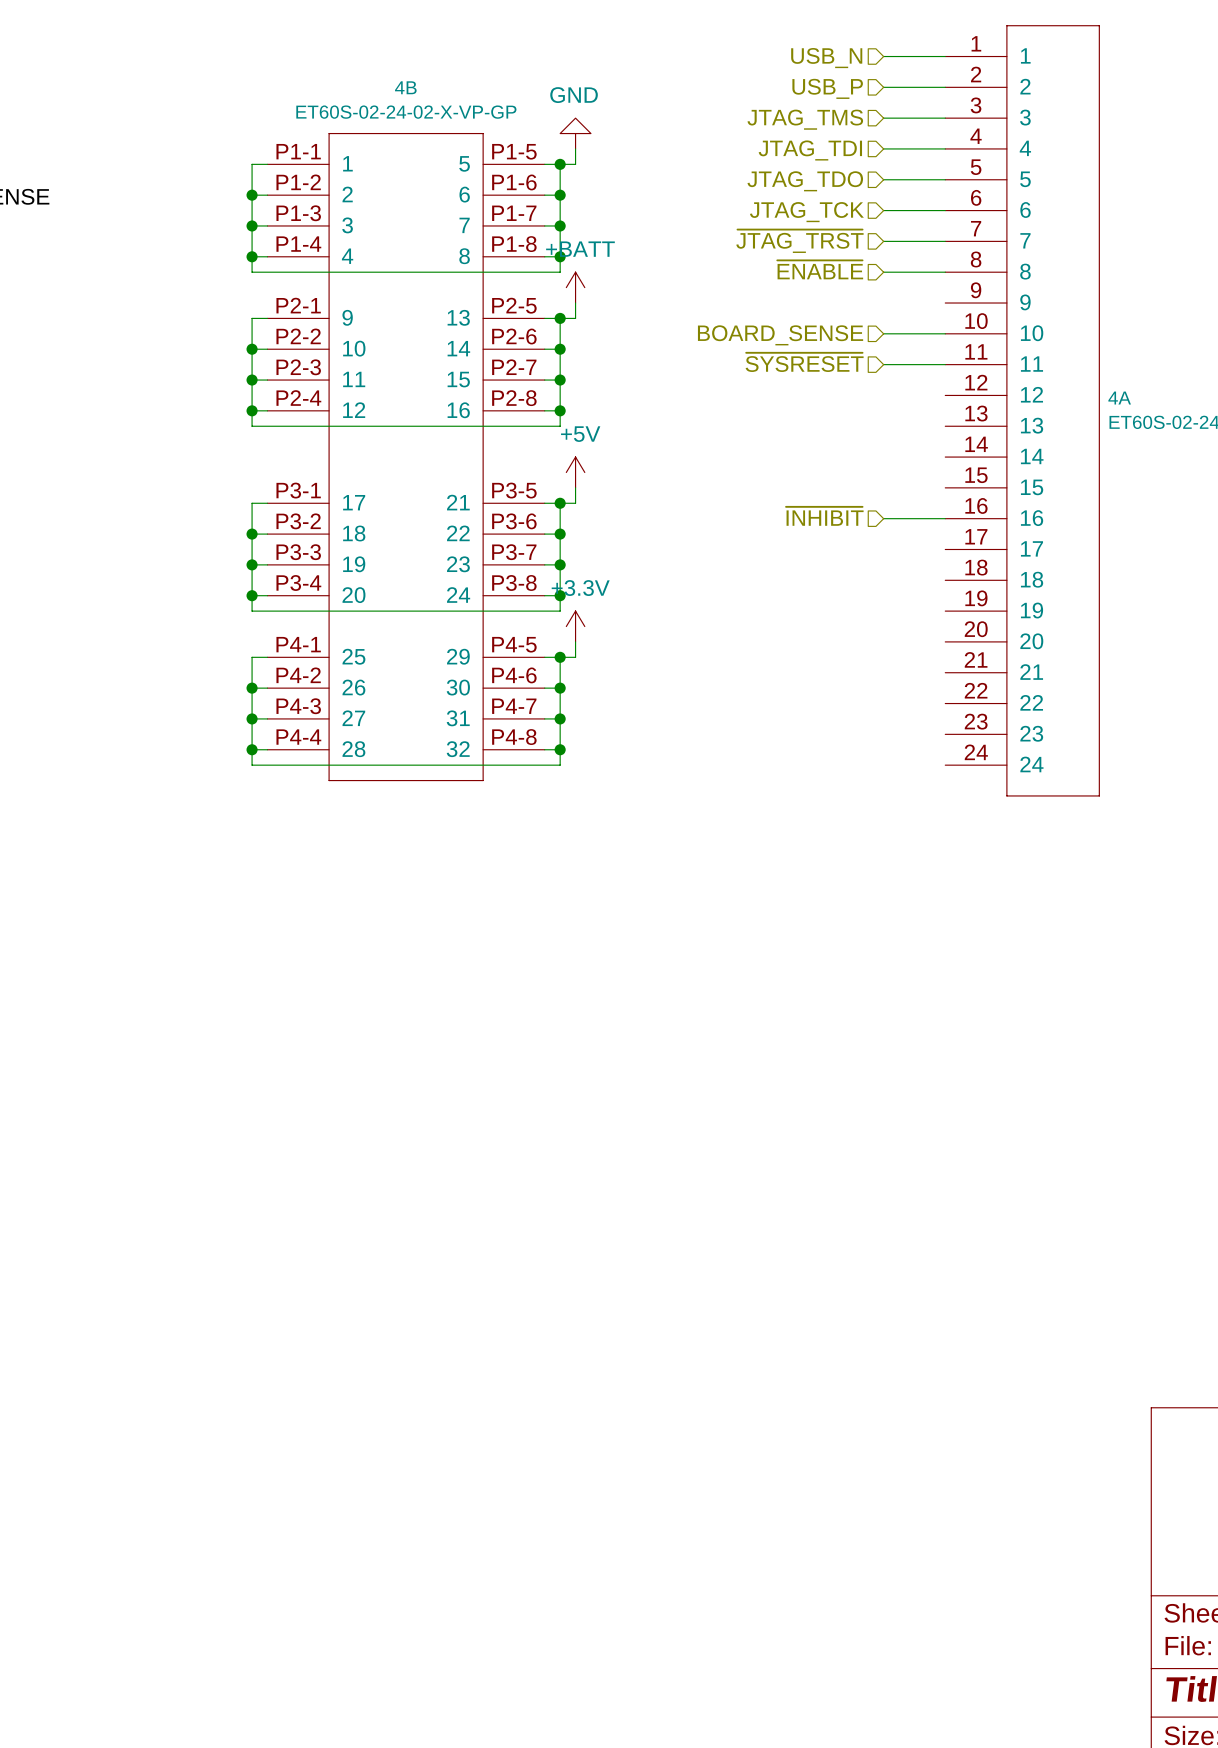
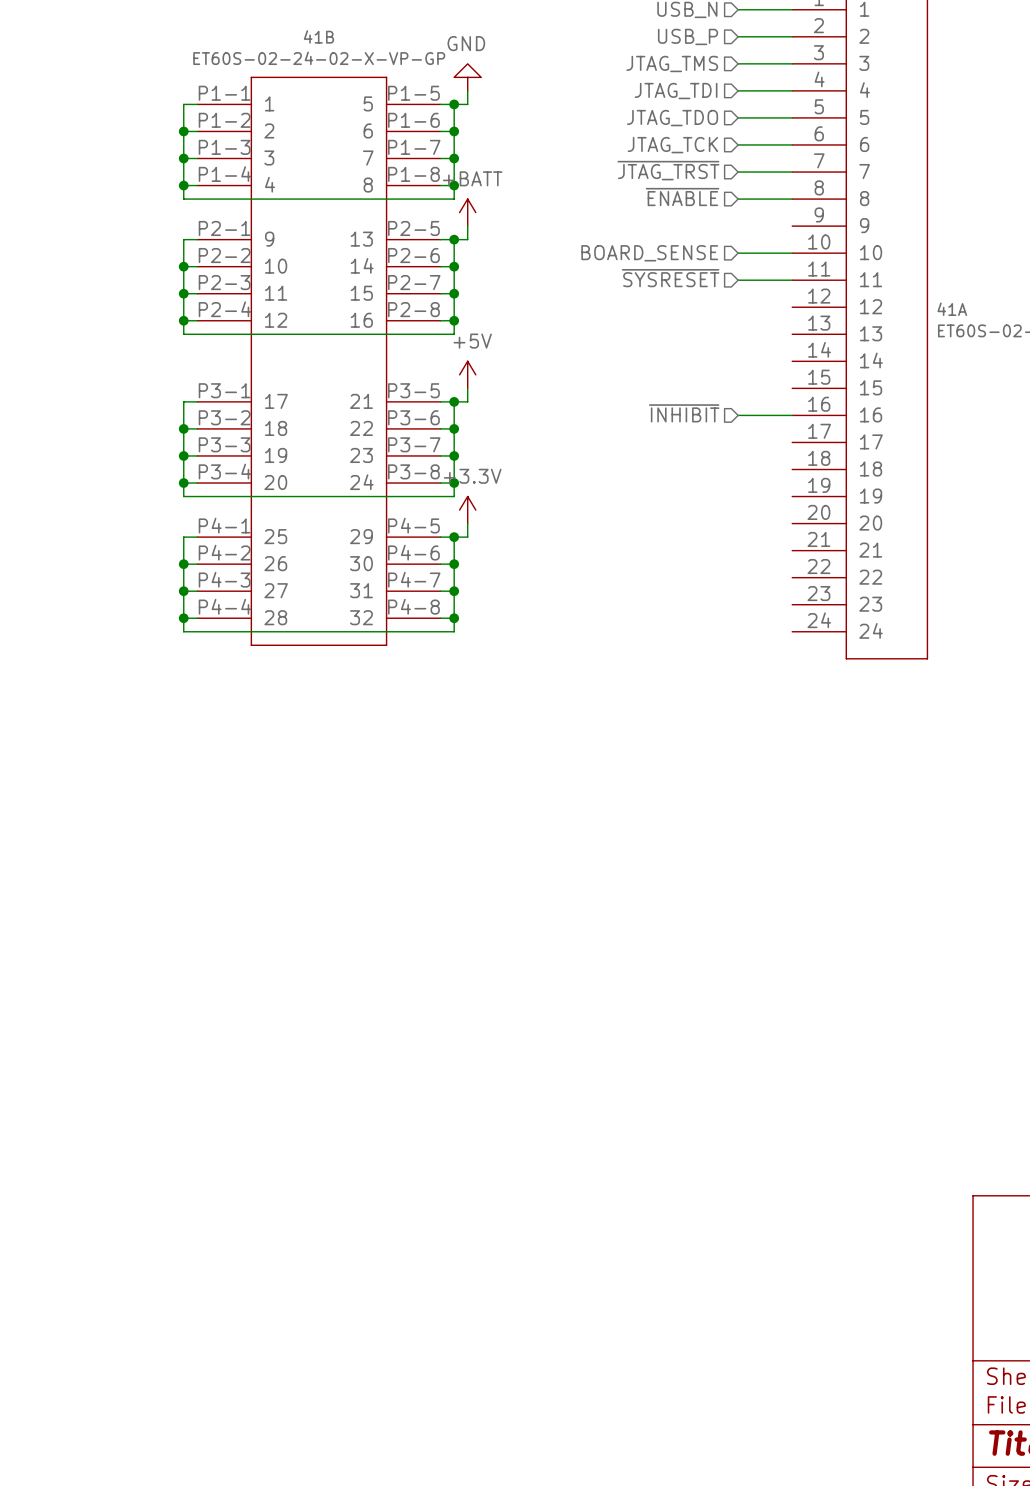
4B name: 4B (405, 87) -> 41B (318, 36)
4A name: 4A (1119, 398) -> 41A (952, 309)

